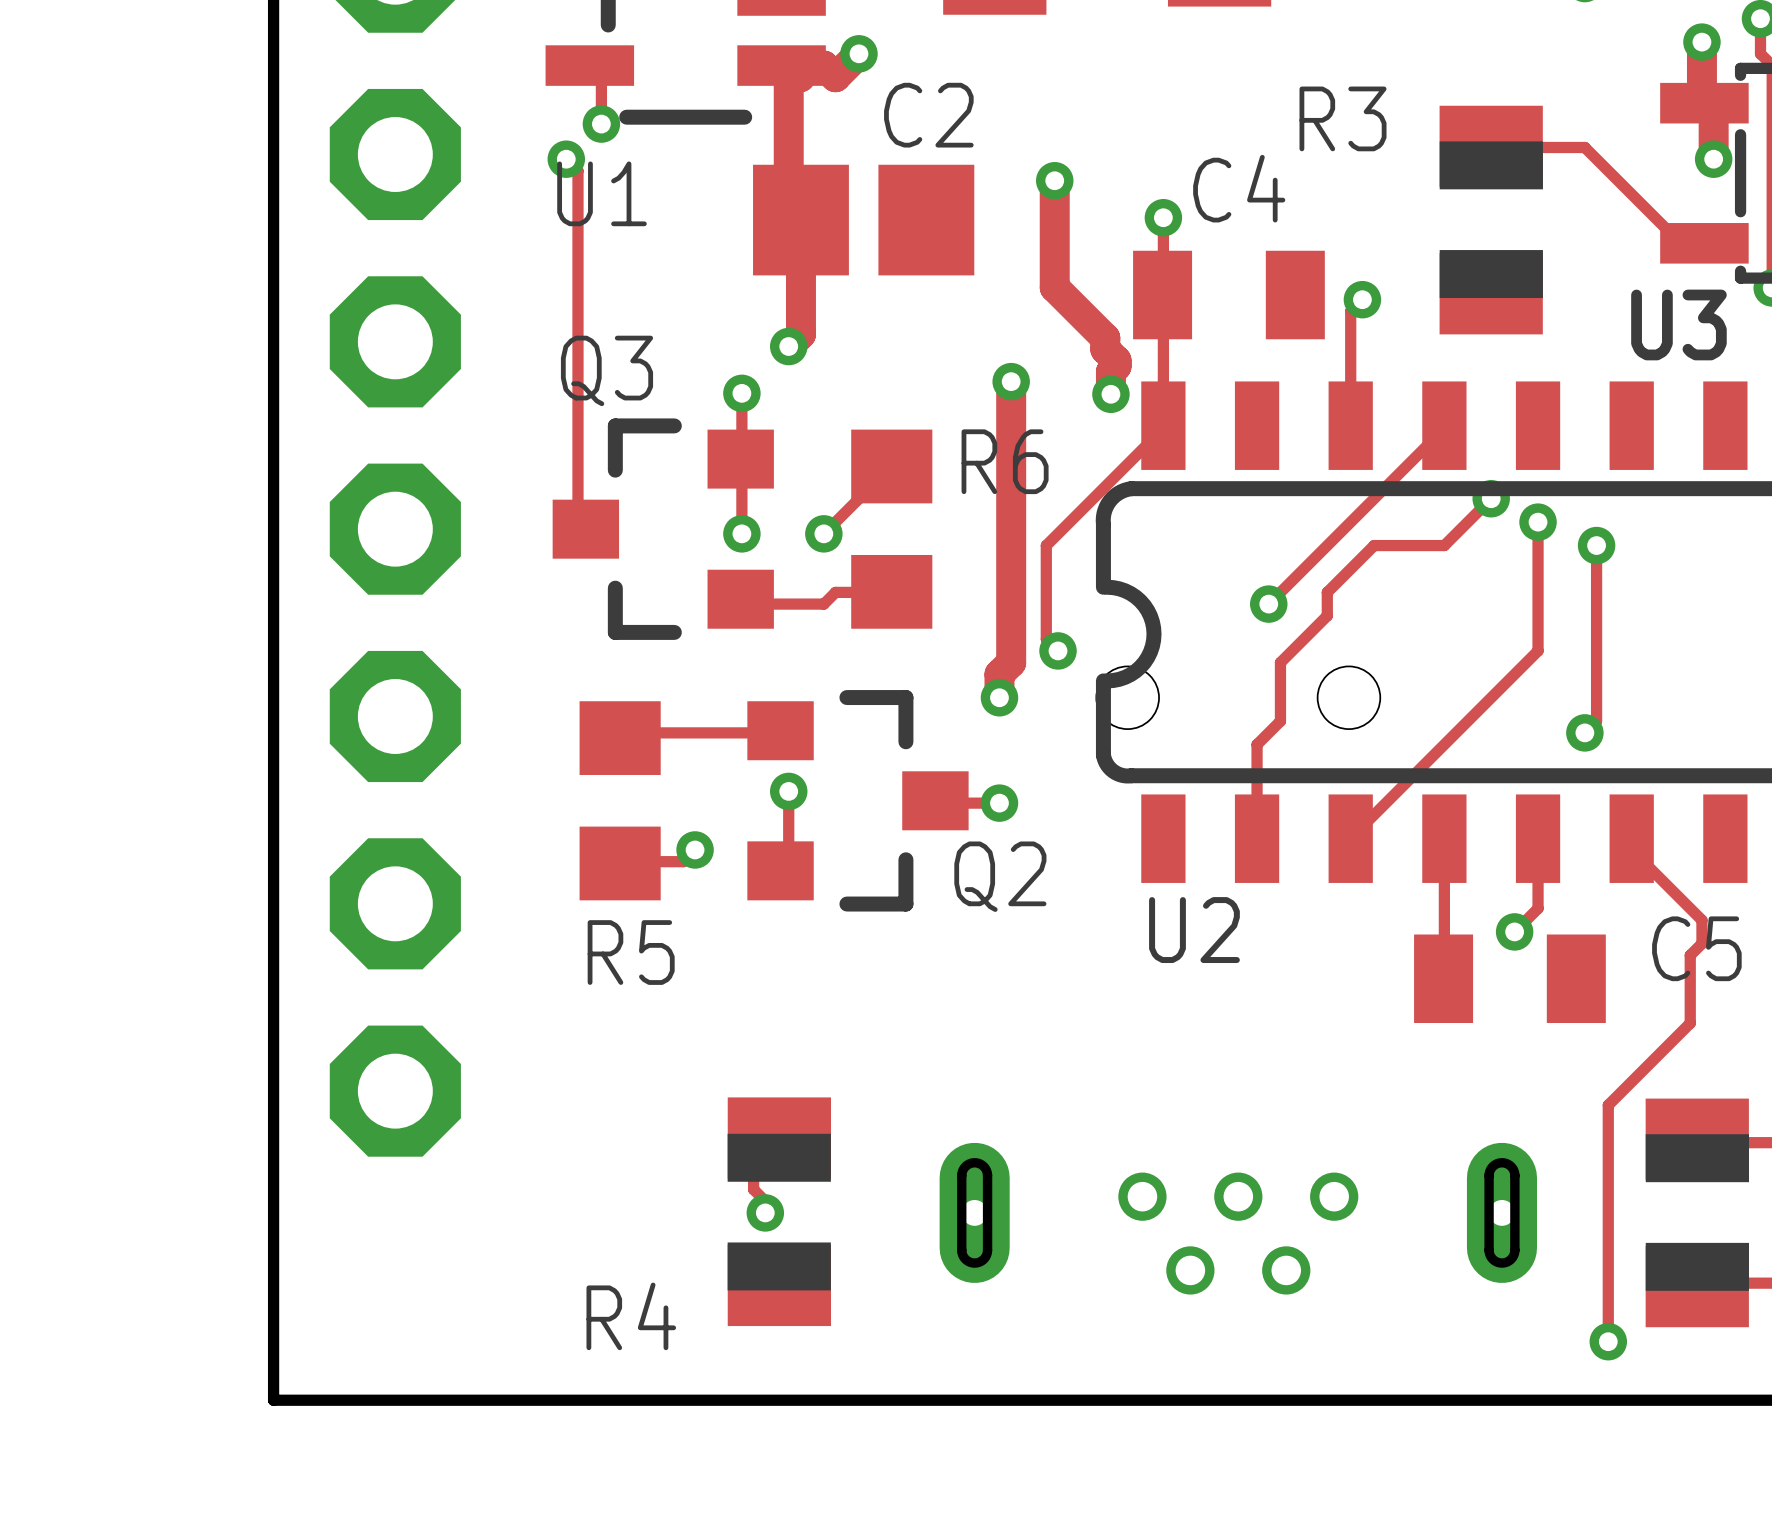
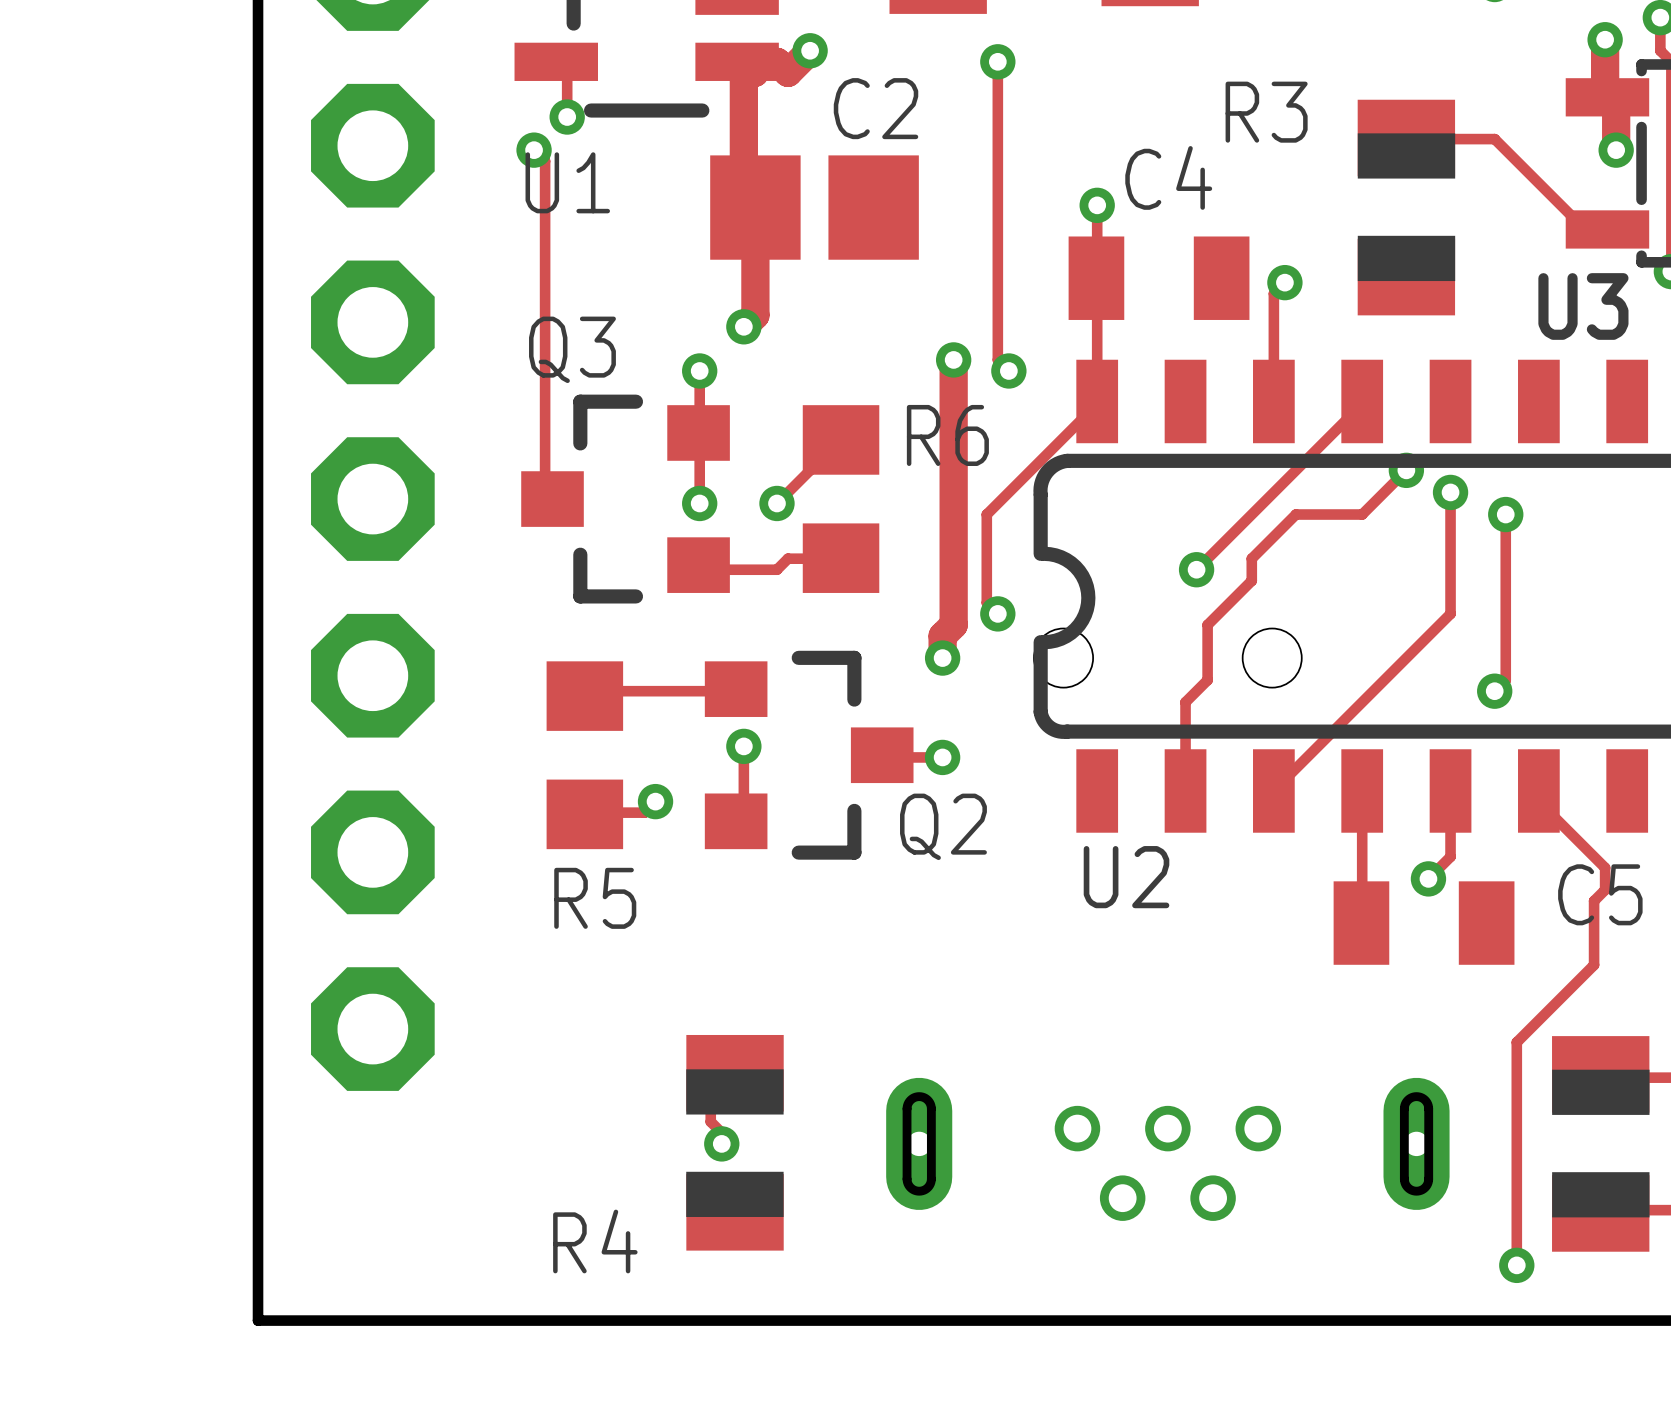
track: none -> (997, 61) (997, 359) (1008, 370)
via: none -> (997, 61)
track: (1054, 180) (1054, 287) (1105, 338) (1105, 349) (1116, 360) (1116, 366) (1110, 371) (1110, 394) -> none
via: (1054, 180) -> none
via position: (1110, 394) -> (1008, 370)

